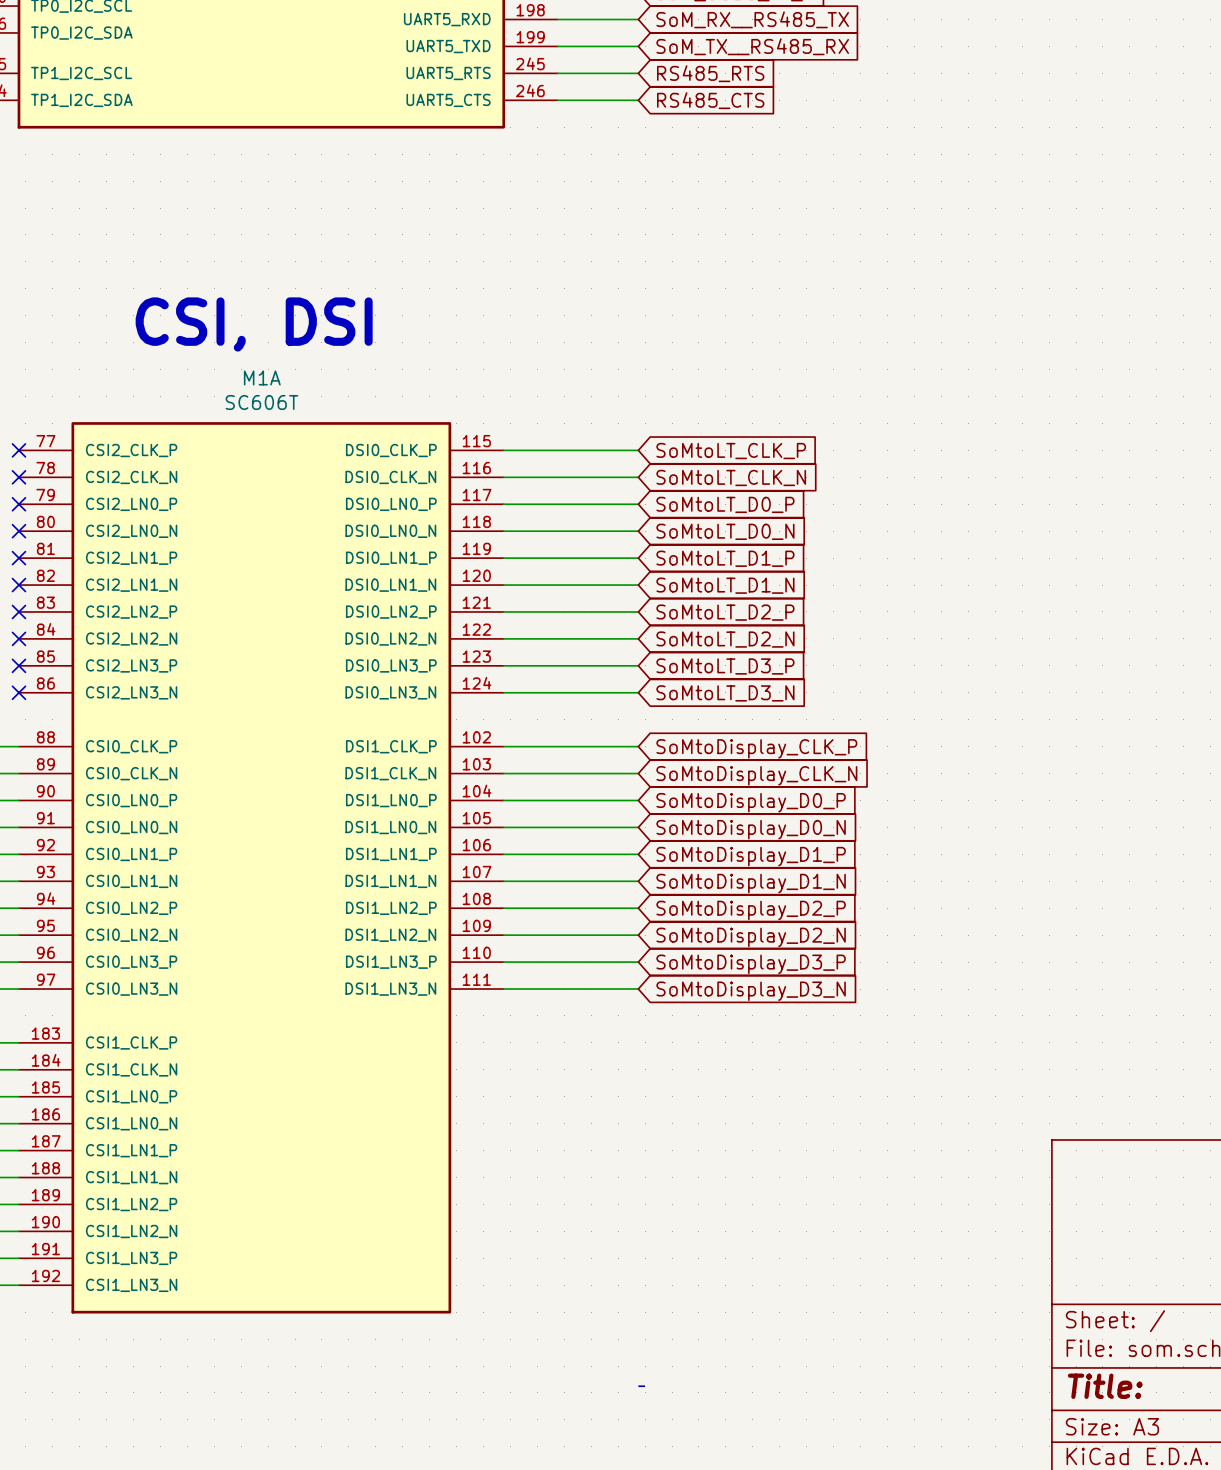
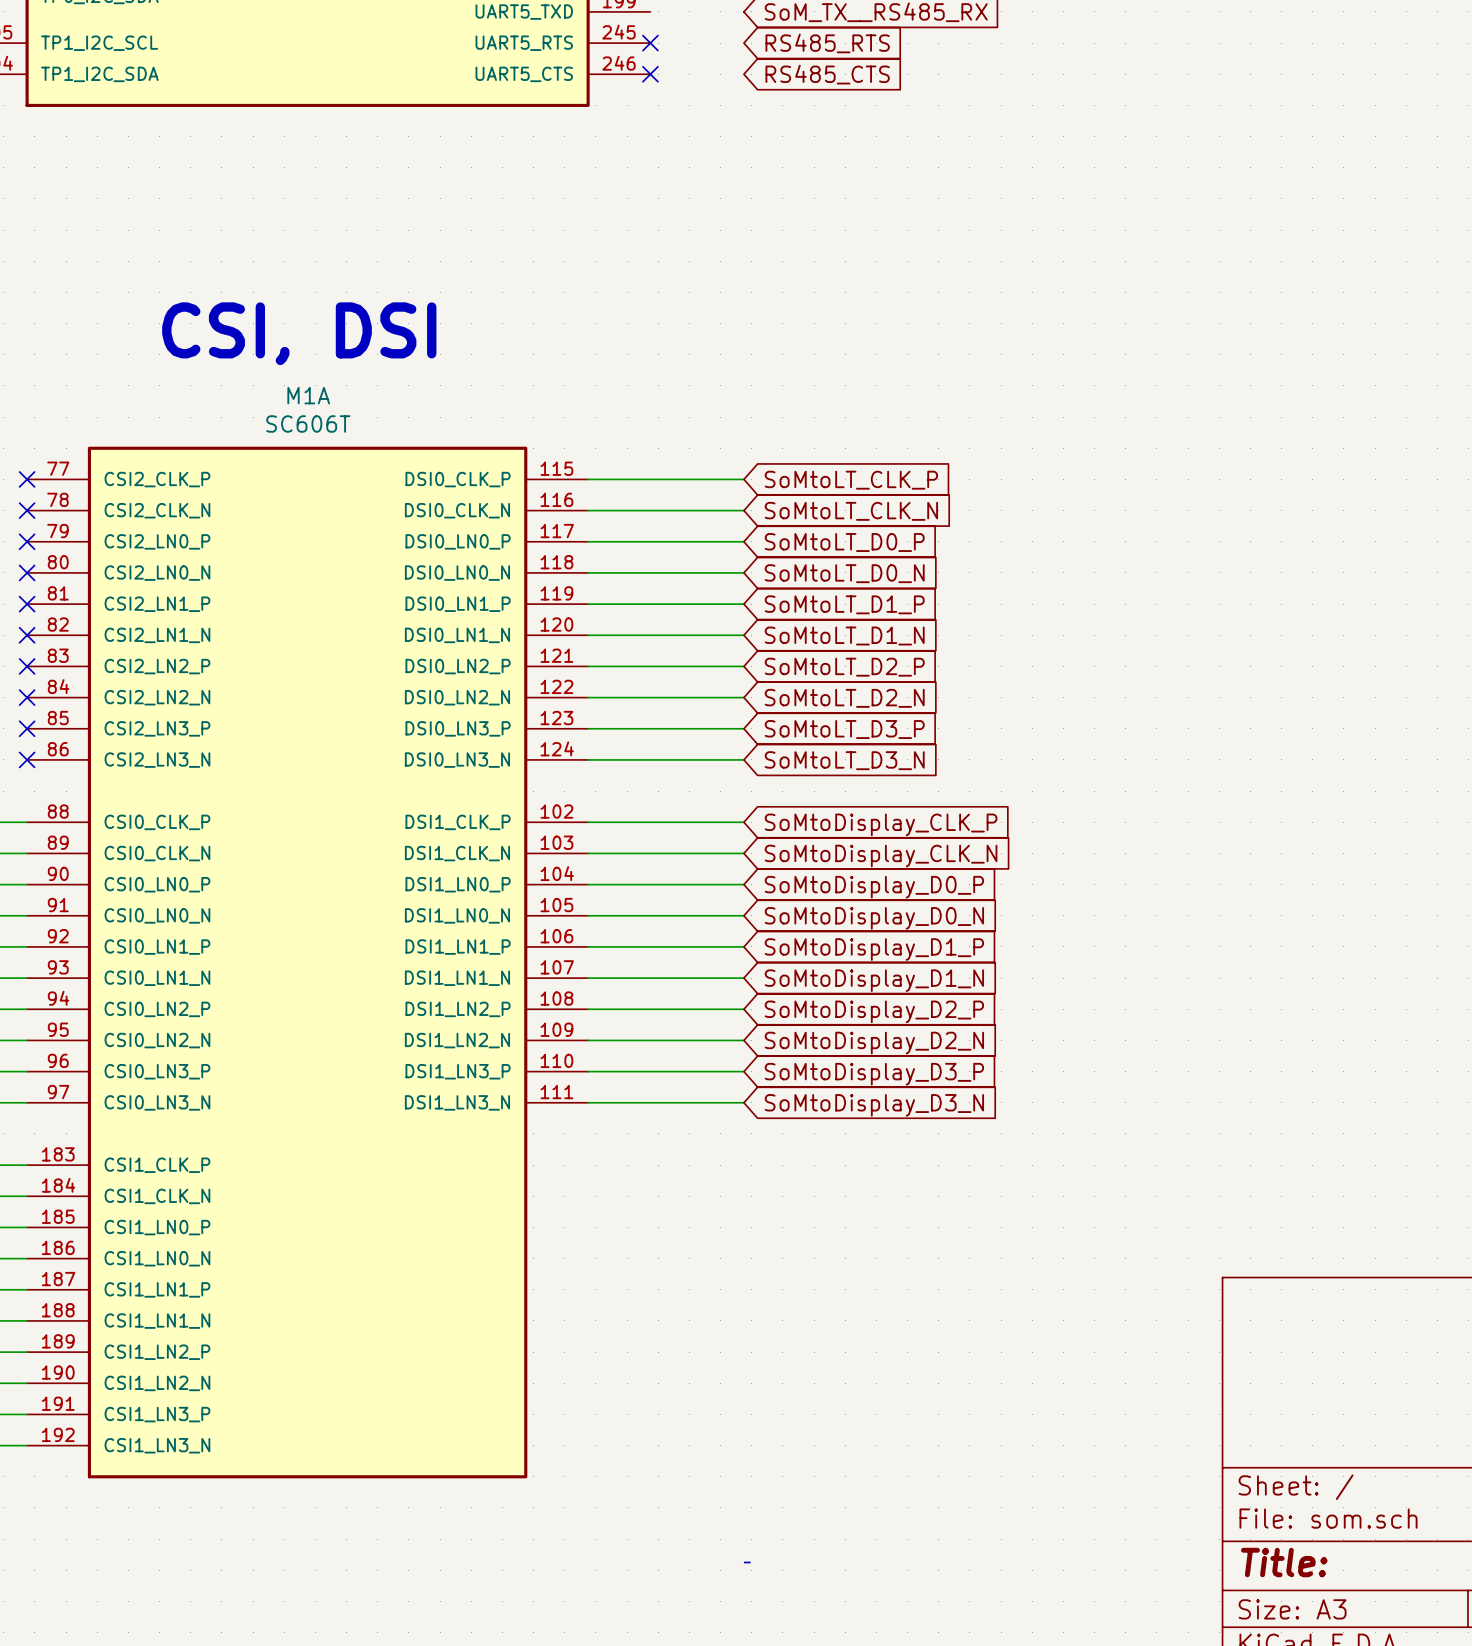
wire: (557, 46) (638, 46) -> none
wire: (557, 73) (638, 73) -> none
no-connect mark: none -> (650, 43)
wire: (557, 100) (638, 100) -> none
no-connect mark: none -> (650, 74)

